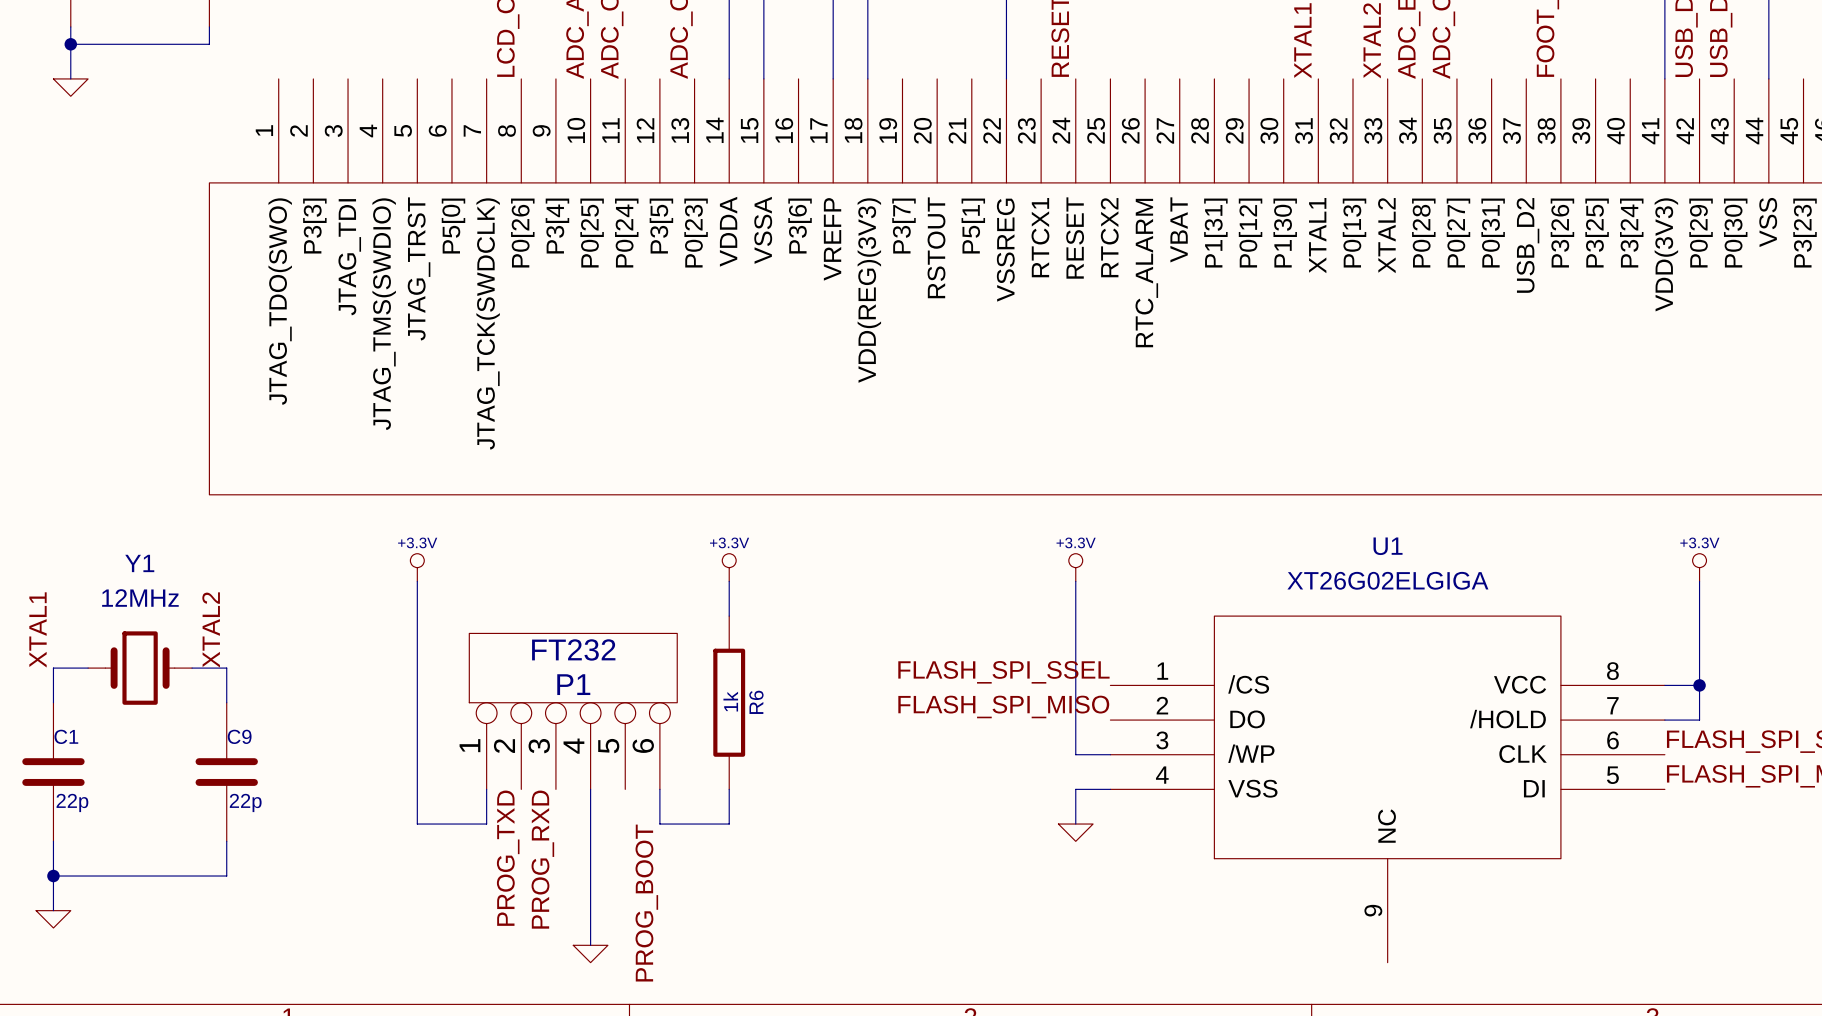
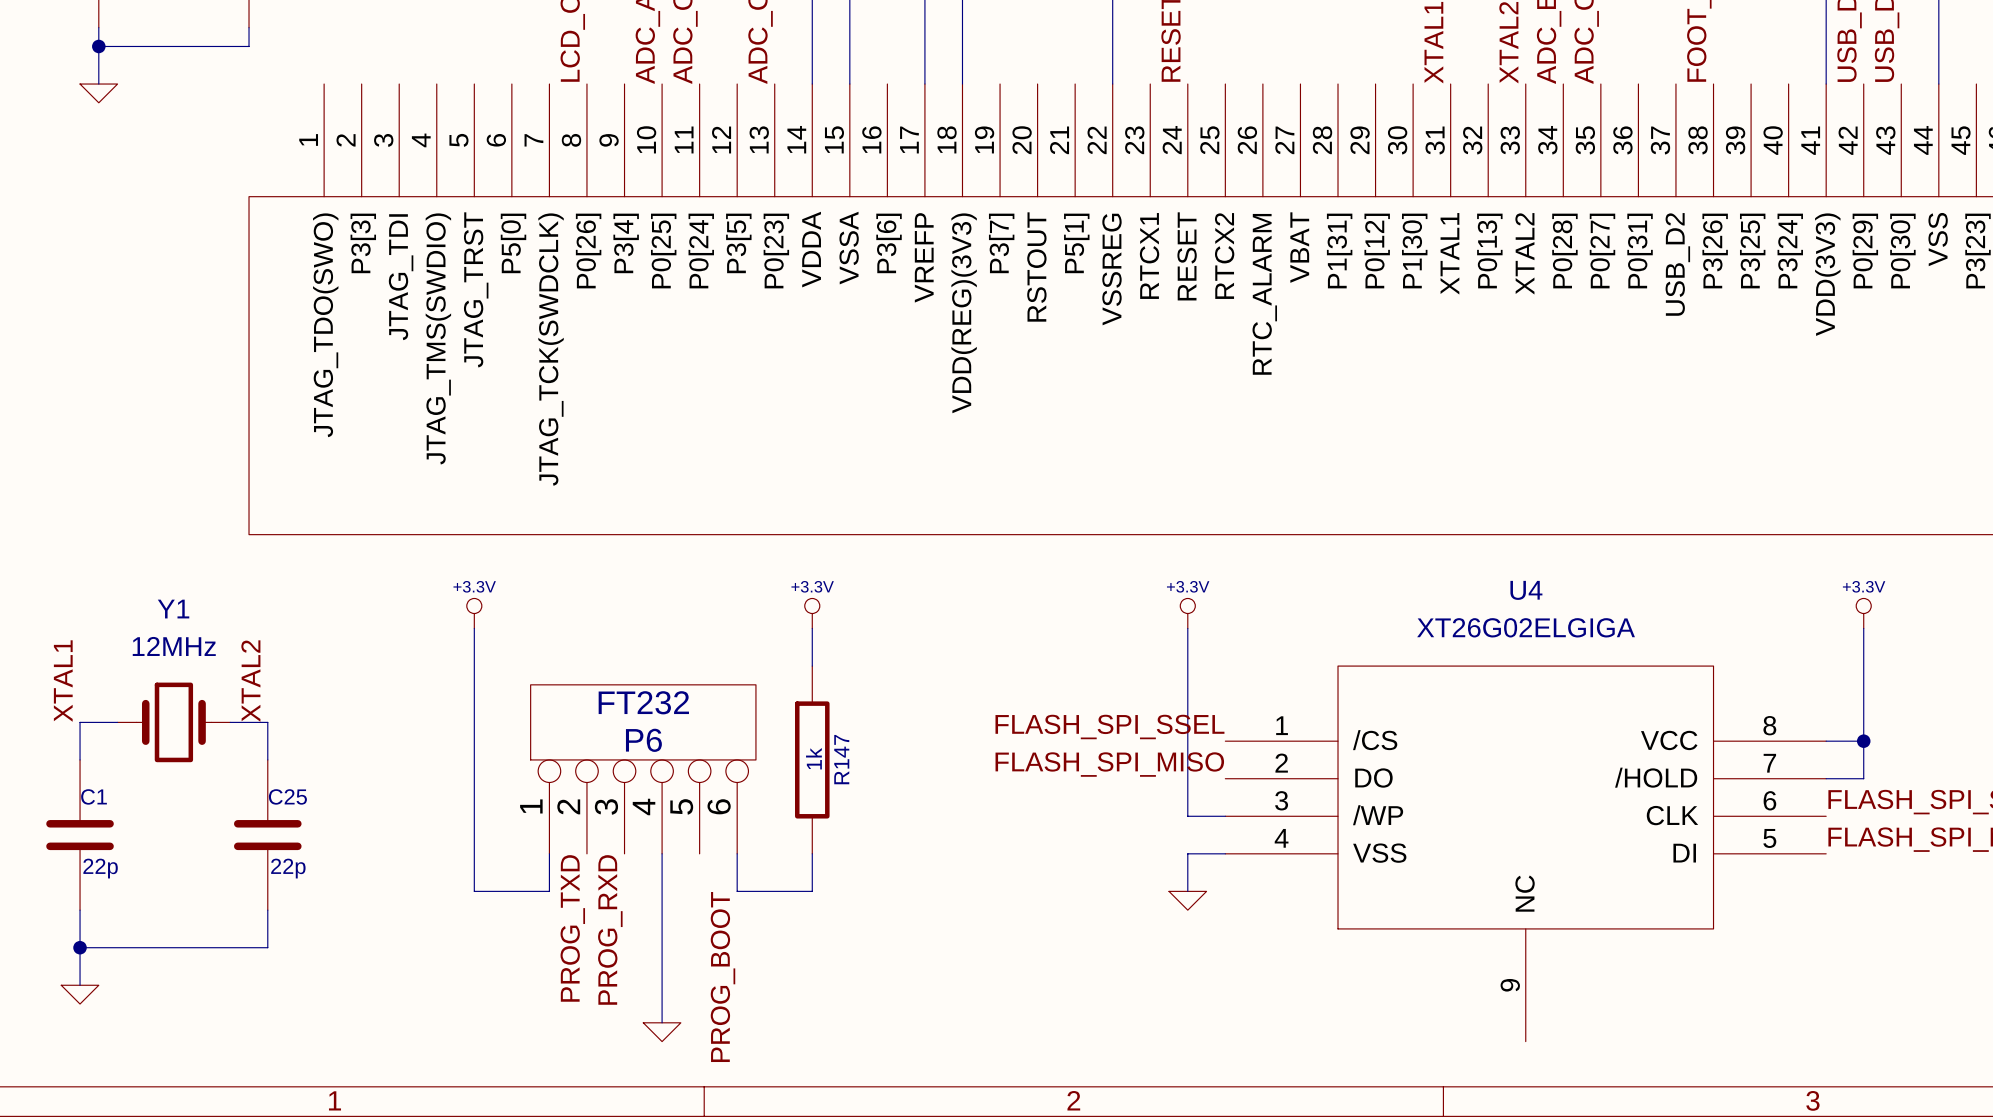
U1 name: U1 (1388, 546) -> U4 (1526, 590)
P1 name: P1 (573, 684) -> P6 (643, 740)
R6 name: R6 (756, 702) -> R147 (841, 759)
C9 name: C9 (239, 736) -> C25 (287, 796)

